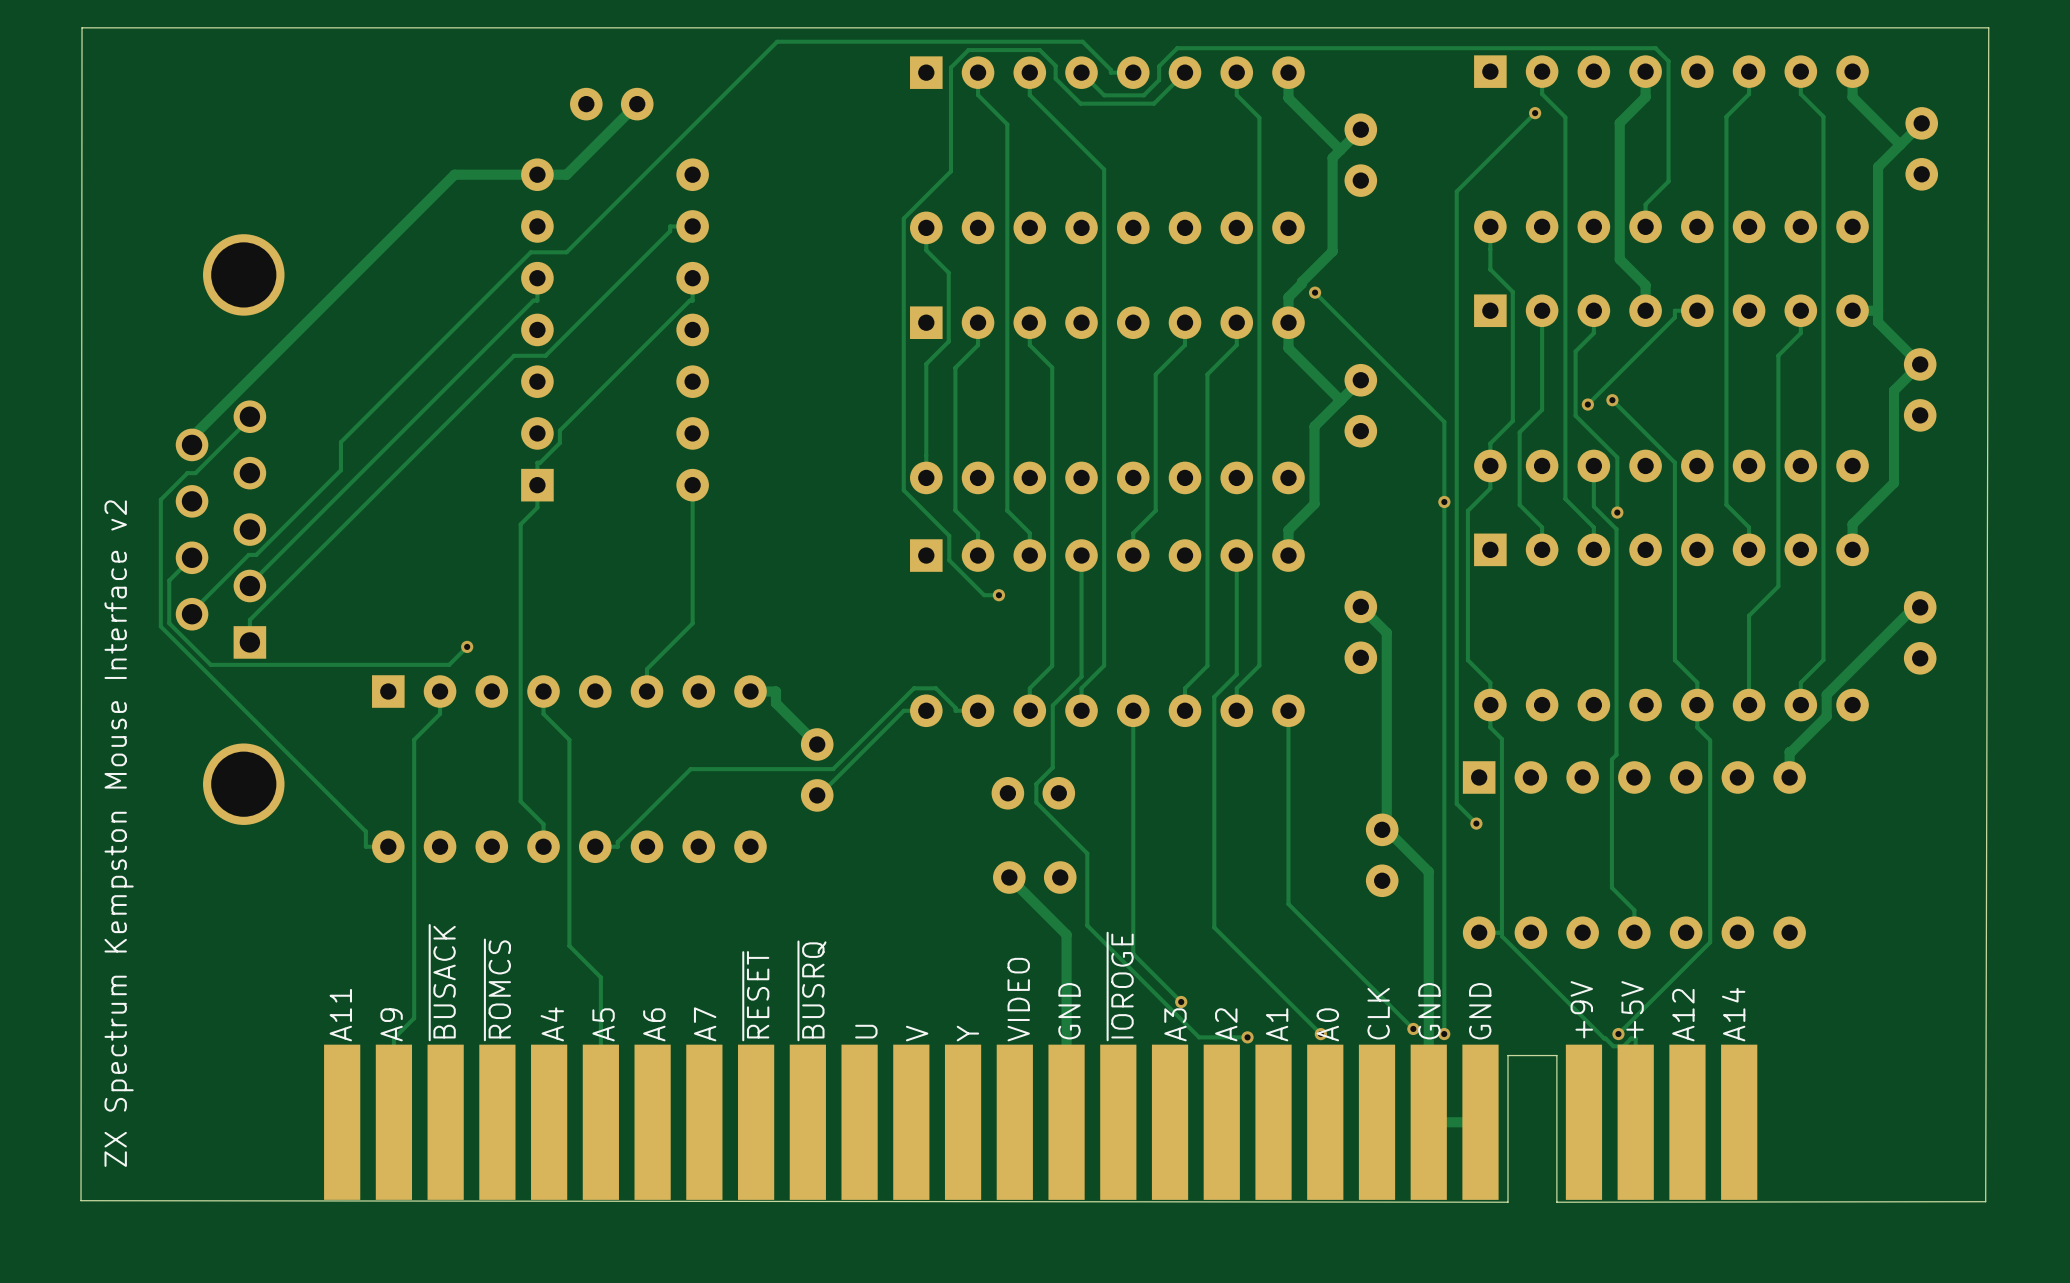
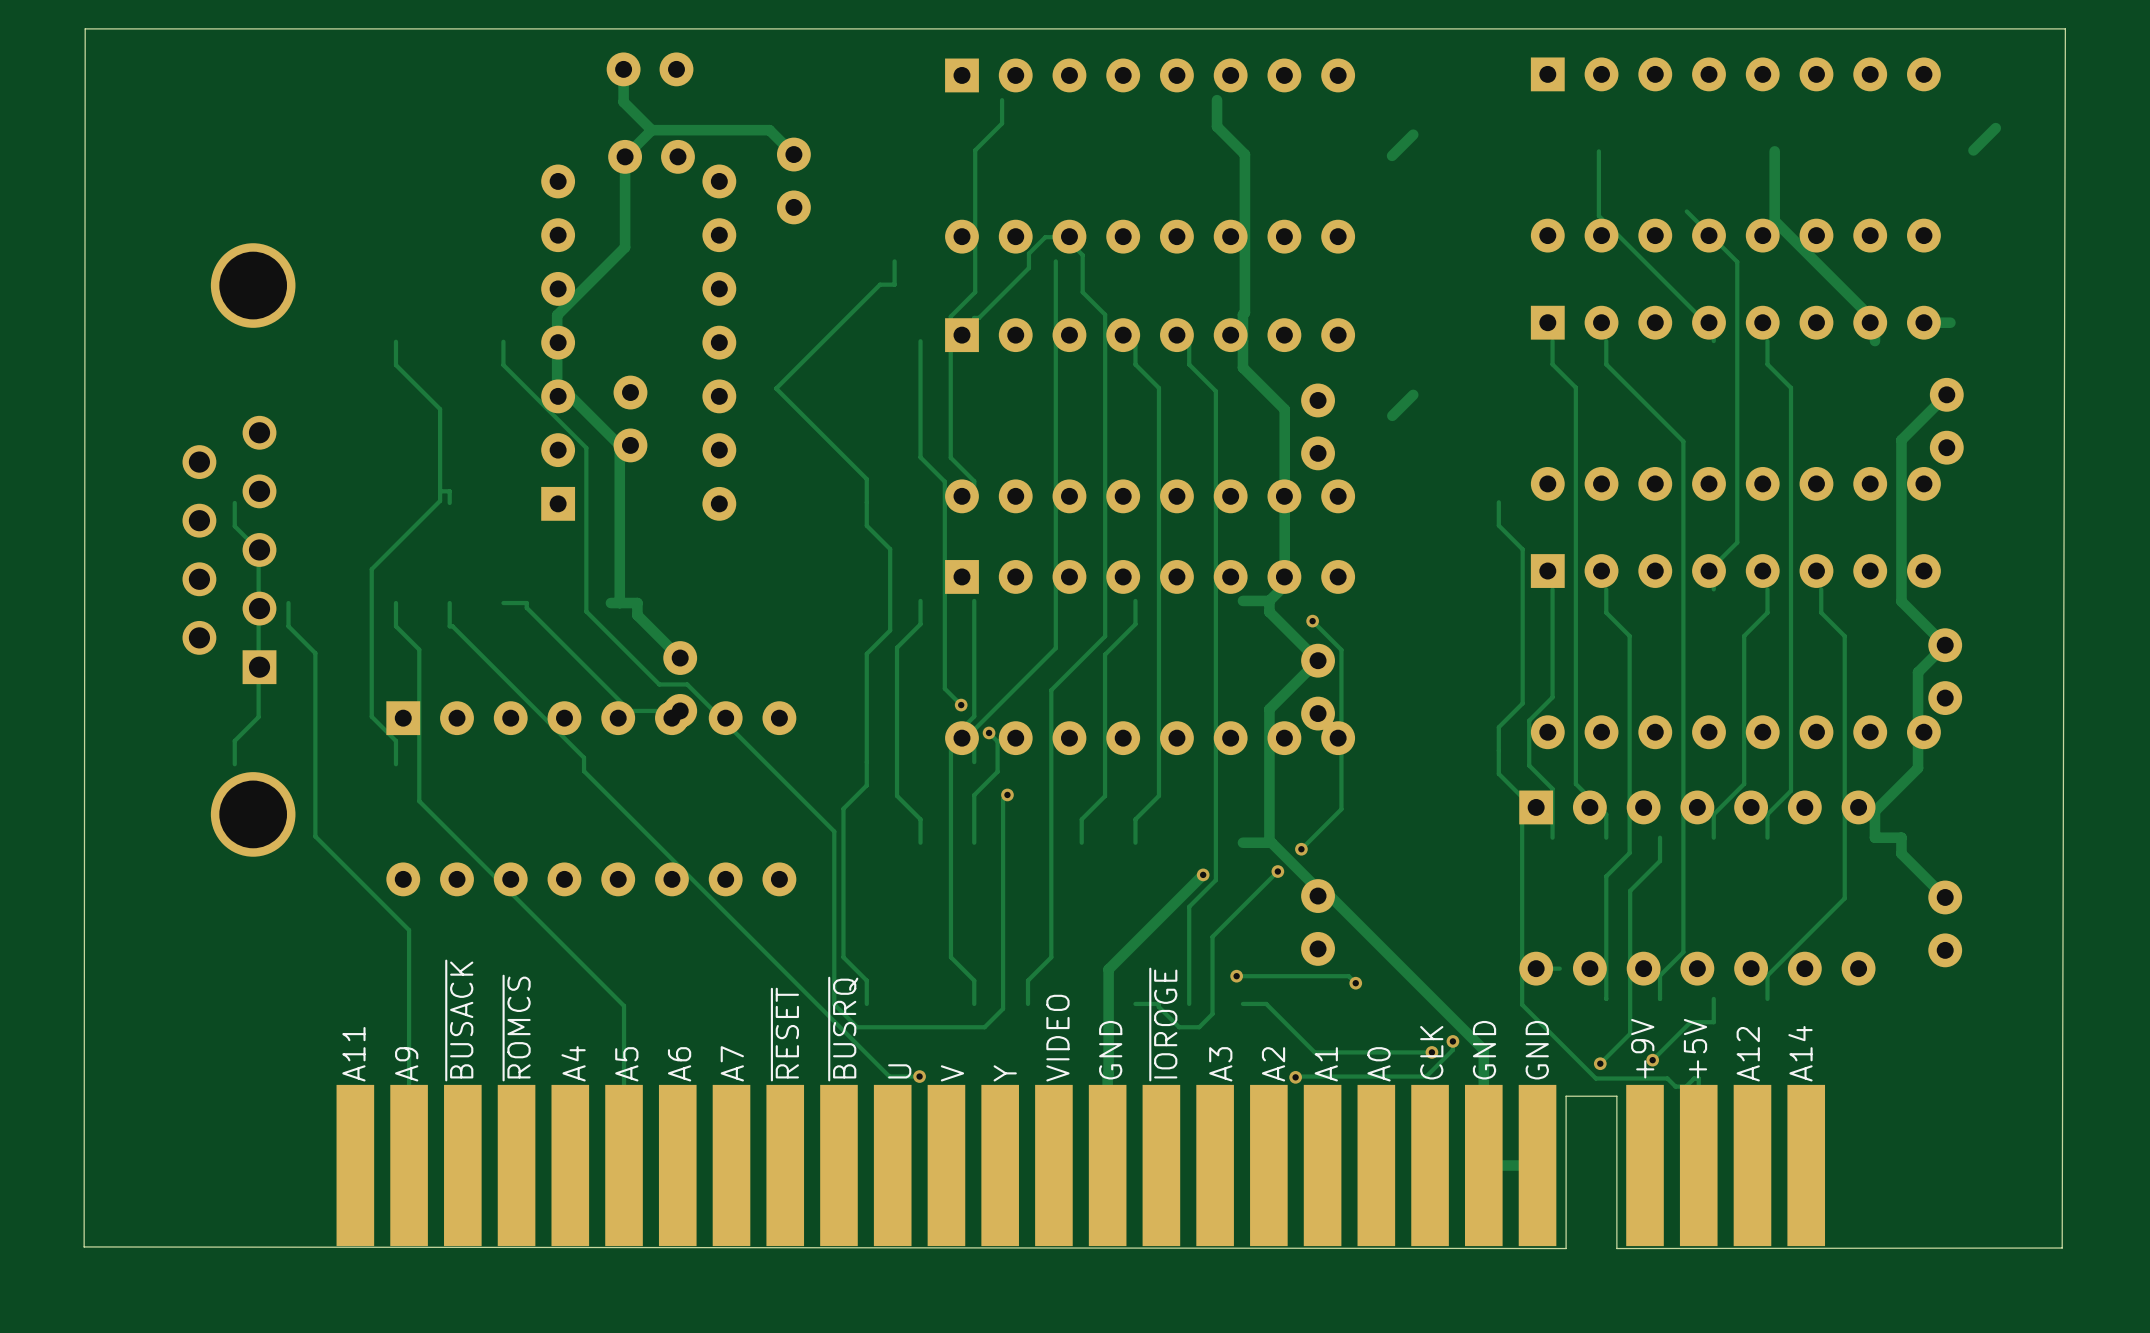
track: none -> (623, 69) (623, 102) (651, 130)
part: none -> (650, 69)
track: (1542, 71) (1542, 94) (1565, 117) (1565, 498) (1593, 527) (1593, 549) -> none
track: (1645, 71) (1645, 97) (1619, 123) (1619, 259) (1645, 285) (1645, 310) -> none
track: (1749, 71) (1749, 94) (1726, 116) (1726, 504) (1749, 527) (1749, 549) -> none
track: (1800, 71) (1800, 94) (1823, 116) (1823, 659) (1800, 682) (1800, 705) -> none
track: (1852, 71) (1852, 97) (1900, 144) (1878, 167) (1878, 322) (1920, 364) (1894, 390) (1894, 482) (1852, 524) (1852, 549) -> none
track: (978, 72) (978, 95) (1007, 124) (1007, 510) (1029, 533) (1029, 555) -> none
track: (1029, 72) (1029, 95) (1104, 169) (1104, 665) (1081, 688) (1081, 710) -> none
track: (1081, 72) (1104, 95) (1143, 95) (1159, 80) (1159, 66) (1177, 48) (1655, 48) (1668, 61) (1668, 181) (1645, 204) (1645, 226) -> none
track: (1133, 72) (1110, 72) (1110, 69) (1082, 41) (777, 41) (566, 252) (530, 252) (340, 442) (340, 470) (256, 554) (248, 554) (192, 611) (192, 614) -> none
track: (1185, 72) (1154, 103) (1080, 103) (1055, 78) (1055, 65) (1039, 50) (968, 50) (950, 67) (950, 171) (903, 218) (903, 490) (949, 535) (949, 560) (984, 595) (998, 595) -> none
track: (1236, 72) (1236, 95) (1259, 117) (1259, 665) (1236, 688) (1236, 710) -> none
track: (1288, 72) (1288, 98) (1340, 150) (1332, 157) (1332, 251) (1288, 297) (1288, 348) (1340, 400) (1314, 426) (1314, 504) (1288, 530) (1288, 555) -> none
track: none -> (1002, 100) (1002, 123) (975, 150) (975, 292) (950, 316) (950, 457) (974, 481) (974, 502)
track: none -> (1217, 100) (1217, 126) (1244, 154) (1242, 367) (1284, 409) (1284, 585) (1269, 600)
part: (611, 104) -> none
track: (637, 104) (566, 174) (454, 174) (192, 437) (192, 444) -> none
track: (1535, 113) (1456, 191) (1456, 803) (1476, 823) -> none
via: (1535, 113) -> none
track: none -> (651, 130) (625, 156) (625, 247) (557, 315) (557, 382) (619, 445)
track: none -> (651, 130) (769, 130) (793, 154)
track: none -> (1598, 151) (1598, 215) (1700, 317) (1713, 317) (1713, 341)
track: none -> (1774, 151) (1774, 220) (1868, 314) (1874, 314) (1874, 341)
part: (1921, 148) -> none
part: none -> (651, 156)
part: (1360, 155) -> none
part: none -> (793, 180)
track: none -> (1686, 211) (1737, 261) (1737, 542) (1713, 566) (1713, 589)
track: (692, 226) (670, 226) (670, 231) (545, 355) (514, 355) (249, 619) (249, 642) -> none
track: (1490, 226) (1490, 269) (1512, 291) (1512, 421) (1490, 443) (1490, 488) (1467, 510) (1467, 660) (1490, 682) (1490, 727) (1501, 739) (1501, 936) (1605, 1038) -> (1498, 502) (1498, 525) (1522, 549) (1522, 703) (1498, 727) (1498, 773) (1522, 797) (1522, 1004) (1595, 1078) (1667, 1078)
track: (926, 227) (926, 250) (948, 272) (948, 341) (926, 363) (926, 477) -> none
track: none -> (894, 261) (894, 284) (880, 284) (776, 388) (866, 479) (866, 525) (890, 549) (890, 630) (866, 653) (866, 785) (843, 808) (843, 957) (866, 980) (866, 1003)
track: none -> (1055, 261) (1055, 648) (974, 729) (974, 762)
track: (537, 278) (537, 300) (533, 300) (249, 586) -> none
track: (692, 278) (692, 300) (689, 300) (559, 430) (559, 443) (540, 462) (537, 462) (537, 507) (520, 524) (520, 801) (543, 824) (543, 846) -> none
track: (1315, 292) (1444, 421) (1444, 1033) -> none
via: (1315, 292) -> none
track: (1542, 310) (1542, 409) (1519, 432) (1519, 504) (1542, 527) (1542, 549) -> none
track: (1593, 310) (1593, 333) (1575, 351) (1575, 415) (1617, 457) (1617, 512) -> none
track: (1697, 310) (1674, 310) (1674, 317) (1587, 404) -> none
track: (1800, 310) (1800, 333) (1778, 355) (1778, 586) (1749, 615) (1749, 705) -> none
track: (978, 322) (978, 345) (955, 367) (955, 510) (978, 533) (978, 555) -> (920, 600) (920, 624) (897, 647) (897, 795) (920, 819) (920, 842)
track: (1029, 322) (1029, 345) (1052, 367) (1052, 665) (1029, 688) (1029, 710) -> none
track: (1185, 322) (1185, 345) (1155, 374) (1155, 510) (1133, 533) (1133, 555) -> (1135, 600) (1135, 624) (1105, 654) (1105, 796) (1081, 819) (1081, 842)
track: (1236, 322) (1236, 345) (1207, 374) (1207, 665) (1185, 688) (1185, 710) -> none
track: none -> (920, 341) (920, 457) (944, 481) (944, 688) (961, 705)
track: none -> (974, 341) (974, 317) (979, 317) (1028, 268) (1028, 253) (1045, 237) (1064, 237) (1082, 255) (1082, 292) (1105, 314) (1105, 636) (1051, 690) (1051, 957) (1028, 980) (1028, 1003)
track: none -> (1135, 341) (1135, 364) (1158, 388) (1158, 795) (1135, 819) (1135, 842)
track: none -> (1189, 341) (1189, 364) (1215, 391) (1215, 880) (1189, 906) (1189, 1003)
track: none -> (1552, 341) (1552, 364) (1575, 387) (1575, 783) (1606, 814) (1606, 837)
track: none -> (1606, 341) (1606, 364) (1683, 441) (1683, 952) (1660, 975) (1660, 998)
track: none -> (1767, 341) (1767, 364) (1791, 387) (1791, 790) (1767, 814) (1767, 837)
track: none -> (395, 341) (395, 365) (440, 409) (440, 500) (371, 569) (371, 716) (395, 740) (395, 764)
track: none -> (503, 341) (503, 365) (586, 447) (586, 611) (659, 684) (687, 684) (834, 831) (834, 1004) (857, 1027) (984, 1027) (1003, 1008) (1003, 799) (1007, 794)
track: none -> (1946, 394) (1901, 440) (1901, 601) (1945, 645) (1918, 672) (1918, 768) (1874, 811) (1874, 837) (1901, 837) (1901, 853) (1945, 897)
part position: (1920, 389) -> (1946, 421)
track: (1612, 400) (1674, 462) (1674, 660) (1697, 682) (1697, 727) (1710, 740) (1710, 942) (1618, 1034) -> none
via: (1612, 400) -> none
part: none -> (630, 418)
via: (1587, 404) -> none
part position: (1360, 405) -> (1318, 426)
track: (249, 416) (195, 473) (187, 473) (160, 499) (160, 626) (365, 831) (365, 846) (388, 846) -> none
track: none -> (619, 445) (619, 603)
track: (1593, 465) (1593, 506) (1616, 529) (1616, 754) (1611, 759) (1611, 887) (1634, 910) (1634, 932) -> none
track: none -> (440, 491) (449, 491) (449, 502)
track: none -> (234, 502) (234, 526) (258, 550) (258, 717) (234, 740) (234, 764)
track: (692, 485) (692, 623) (647, 669) (647, 691) -> none
via: (1444, 501) -> none
via: (1617, 512) -> none
track: (1081, 555) (1081, 676) (1052, 705) (1052, 767) (1036, 783) (1036, 802) (1087, 853) (1087, 925) (1199, 1037) (1247, 1037) -> (1452, 1041) (1452, 1049) (1426, 1076) (1295, 1076)
track: (1236, 555) (1236, 674) (1214, 696) (1214, 927) (1320, 1034) -> none
track: (192, 557) (169, 580) (169, 623) (210, 664) (449, 664) (467, 646) -> none
track: none -> (1552, 589) (1552, 697) (1529, 720) (1529, 765) (1552, 788) (1552, 837)
track: none -> (1606, 589) (1606, 612) (1629, 636) (1629, 853) (1606, 876) (1606, 998)
track: none -> (1767, 589) (1767, 612) (1744, 636) (1744, 783) (1713, 814) (1713, 837)
track: none -> (1821, 589) (1821, 612) (1844, 636) (1844, 898) (1767, 975) (1767, 998)
track: none -> (974, 600) (974, 716) (950, 739) (950, 957) (974, 980) (974, 1003)
track: none -> (1269, 600) (1242, 600)
track: none -> (1269, 600) (1269, 612) (1318, 660) (1269, 709) (1269, 842)
track: none -> (449, 603) (449, 626) (452, 626) (584, 757) (584, 771) (889, 1076) (919, 1076)
track: none -> (503, 603) (526, 603) (526, 607) (629, 710) (680, 710)
via: (998, 595) -> none
track: none -> (1312, 621) (1341, 649) (1341, 809) (1301, 849)
via: none -> (1312, 621)
track: (1360, 606) (1386, 632) (1386, 829) -> none
track: (1920, 607) (1914, 607) (1826, 694) (1826, 716) (1789, 751) (1789, 777) -> none
part position: (1360, 632) -> (1318, 687)
part position: (1920, 632) -> (1945, 671)
via: (467, 646) -> none
via: none -> (961, 705)
track: (440, 691) (440, 713) (414, 739) (414, 1018) (393, 1038) -> (288, 603) (288, 626) (315, 653) (315, 836) (409, 930) (409, 1078)
track: (543, 691) (543, 713) (569, 739) (569, 945) (600, 977) -> (395, 603) (395, 626) (419, 649) (419, 801) (624, 1005) (624, 1015)
track: (750, 691) (776, 691) (776, 703) (817, 744) -> (610, 603) (637, 603) (637, 615) (680, 658)
track: none -> (989, 732) (997, 741) (997, 771) (974, 795) (974, 842)
via: none -> (989, 732)
track: (926, 710) (903, 710) (817, 795) -> none
track: (978, 710) (955, 710) (955, 707) (935, 688) (914, 688) (833, 769) (690, 769) (617, 842) (617, 846) (595, 846) -> none
track: (1133, 710) (1133, 954) (1181, 1001) -> none
track: (1288, 710) (1288, 904) (1413, 1028) -> none
via: none -> (1007, 794)
part position: (817, 769) -> (680, 684)
part: (1033, 793) -> none
track: none -> (1660, 837) (1660, 861) (1630, 890) (1630, 1033) (1600, 1063)
via: none -> (1301, 849)
via: (1476, 823) -> none
track: (1386, 829) (1428, 871) (1428, 1010) -> (1242, 842) (1271, 842) (1318, 889) (1318, 896) (1330, 896) (1483, 1049)
text: ZX Spectrum Kempston Mouse Interface v2 (119, 833) -> none
track: none -> (1277, 871) (1212, 936) (1212, 1013) (1199, 1027) (1179, 1027) (1158, 1006) (1158, 1003) (1135, 1003)
via: none -> (1277, 871)
via: none -> (1203, 874)
part: (1382, 855) -> none
track: (1009, 877) (1066, 934) (1066, 1035) -> (1203, 874) (1108, 969) (1107, 1075)
part: (1034, 877) -> none
part: none -> (1318, 922)
part: none -> (1945, 923)
track: none -> (1236, 976) (1348, 976) (1355, 983)
via: none -> (1355, 983)
track: none -> (1713, 998) (1713, 1022) (1690, 1022) (1652, 1060)
track: none -> (1242, 1003) (1266, 1003) (1314, 1052) (1431, 1052)
via position: (1181, 1001) -> (1236, 976)
via: none -> (1452, 1041)
via: none -> (1431, 1052)
via: none -> (1600, 1063)
via: (1413, 1028) -> none
via: (1320, 1034) -> none
via: (1444, 1034) -> none
via position: (1618, 1034) -> (1652, 1060)
via: none -> (919, 1076)

